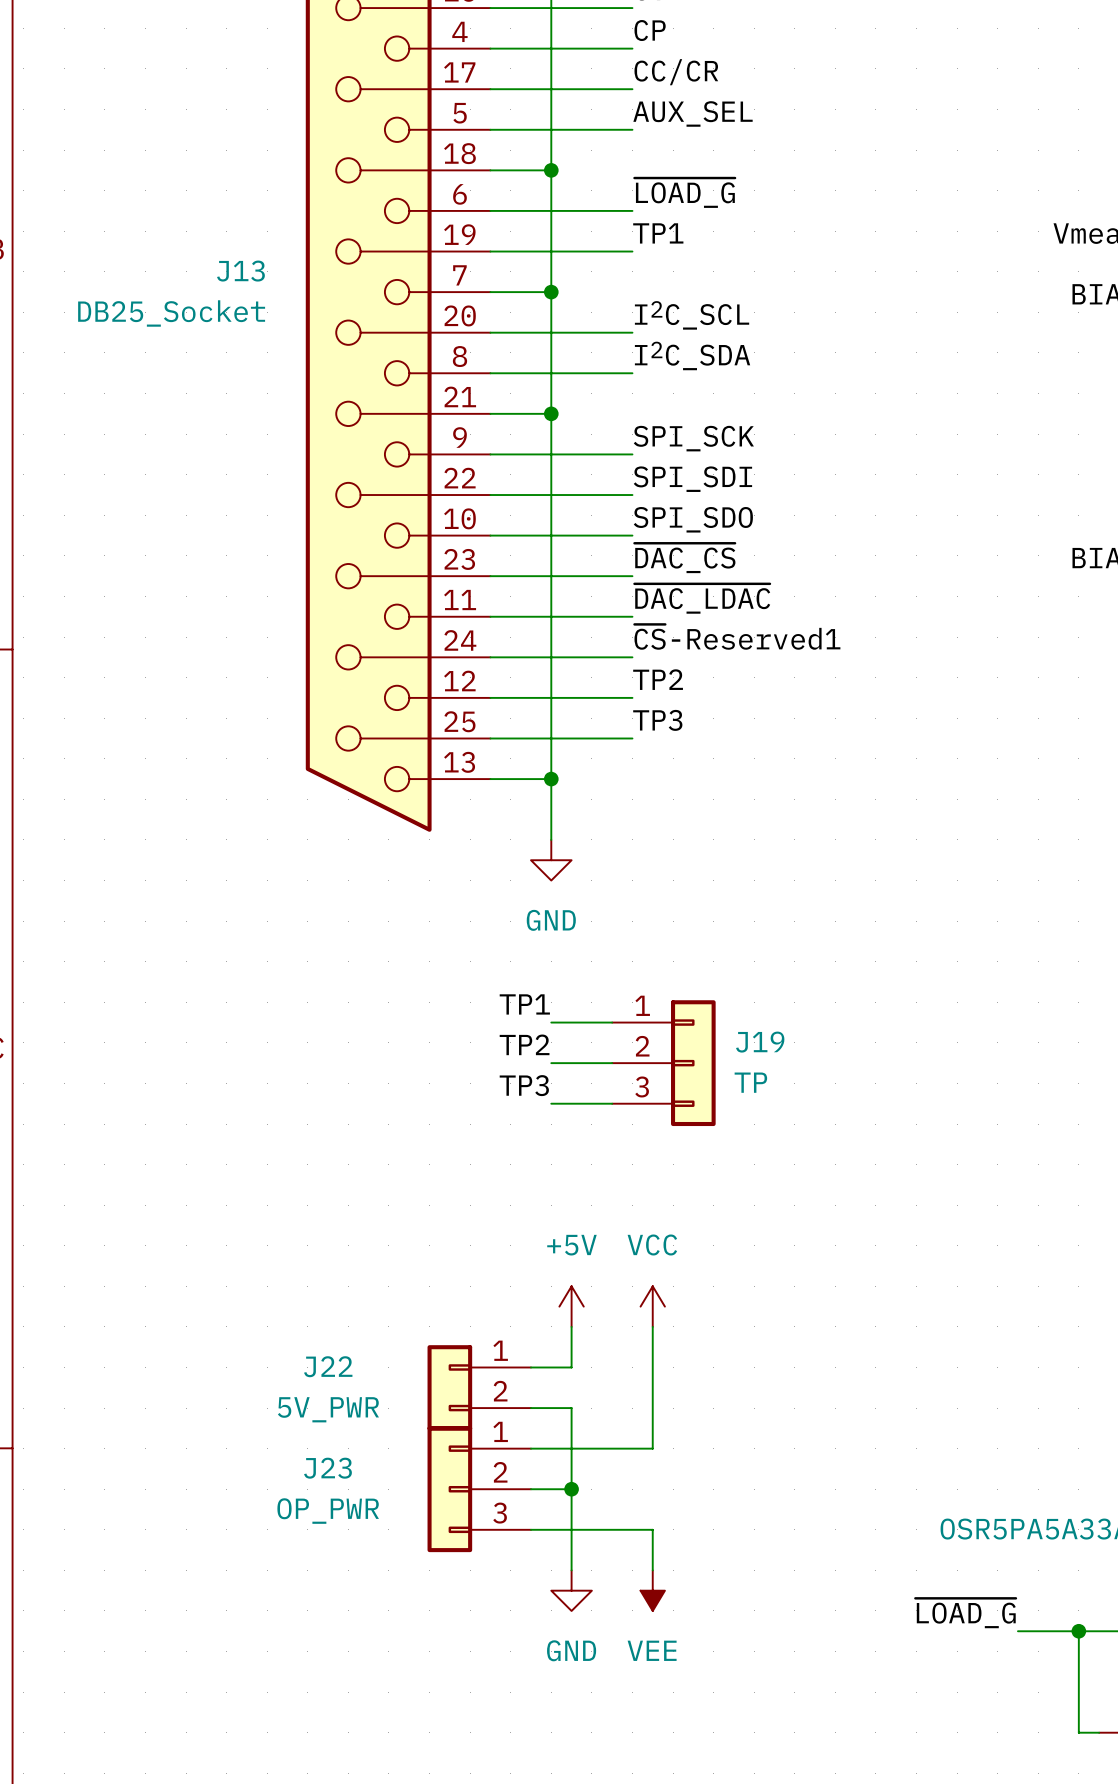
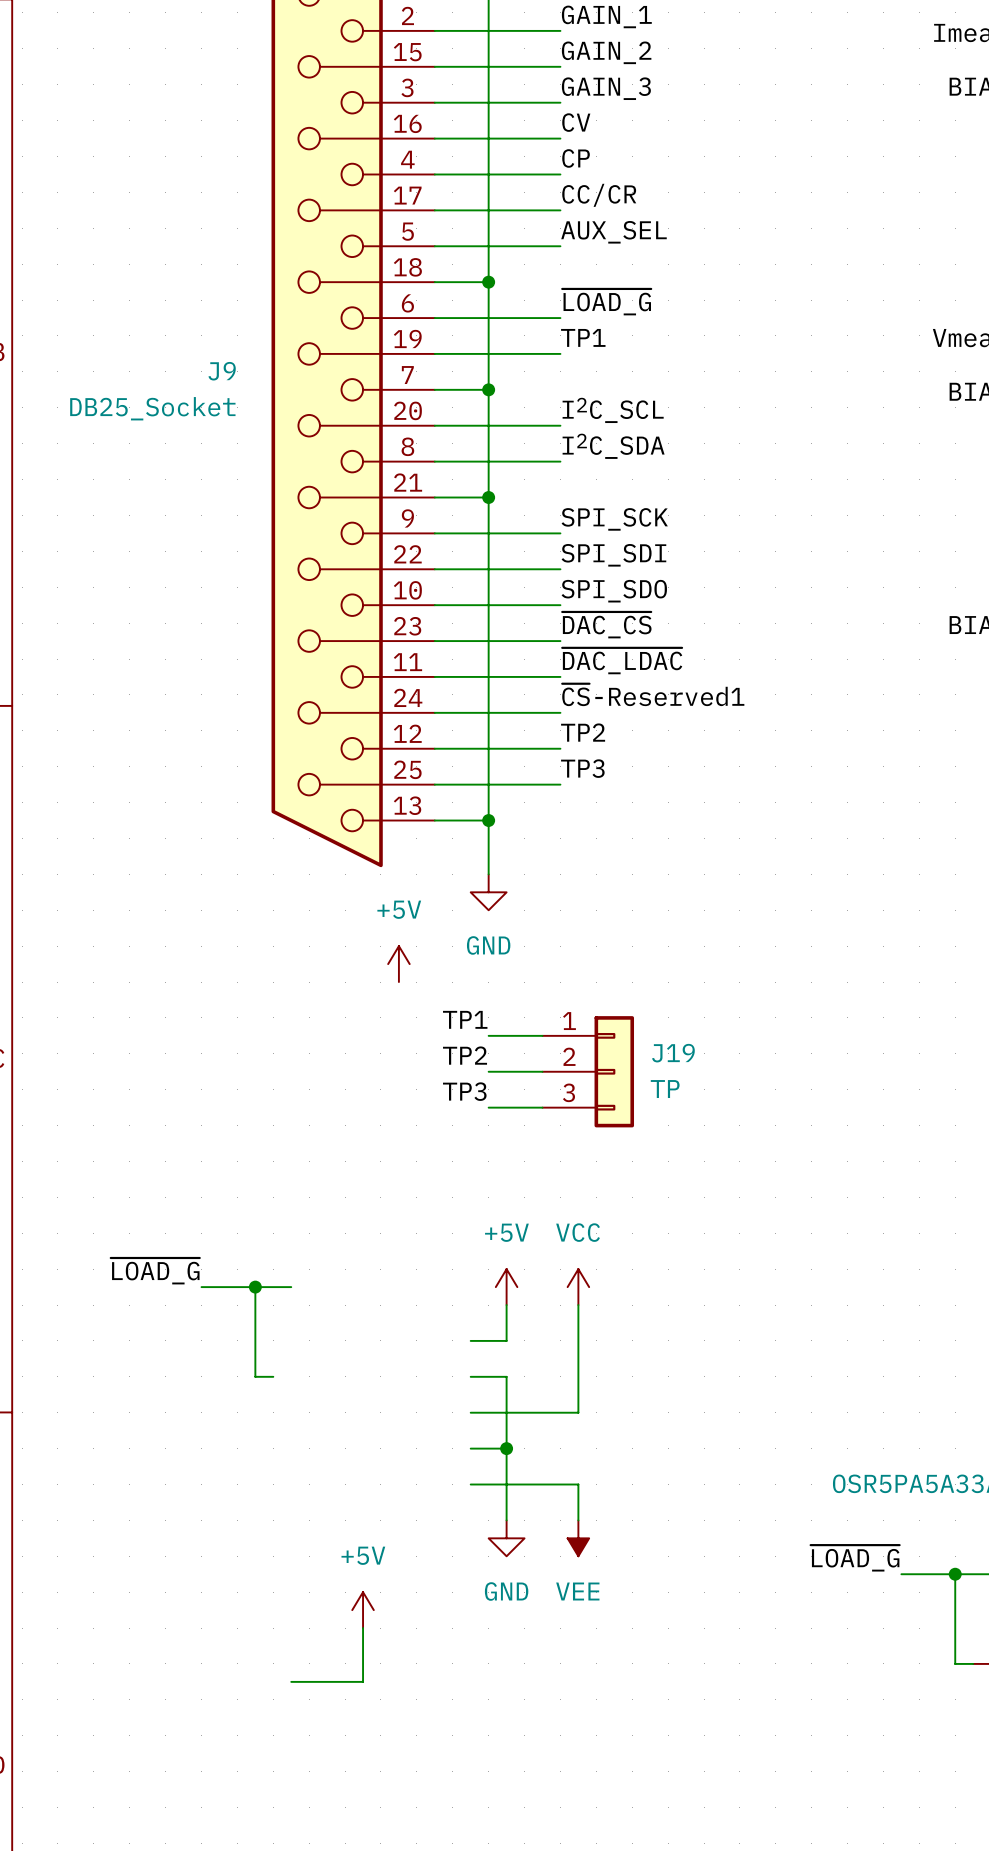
J13 name: J13 (240, 271) -> J9 (222, 371)
power symbol: none -> +5V (398, 964)
label: none -> ~{LOAD_G} (155, 1271)
wire: none -> (201, 1287) (291, 1287)
wire: none -> (255, 1287) (255, 1376) (273, 1376)
junction: none -> (255, 1287)
J22: 5V_PWR (479, 1387) -> none
J23: OP_PWR (479, 1489) -> none
power symbol: none -> +5V (363, 1610)
wire: none -> (363, 1628) (363, 1681) (291, 1681)

